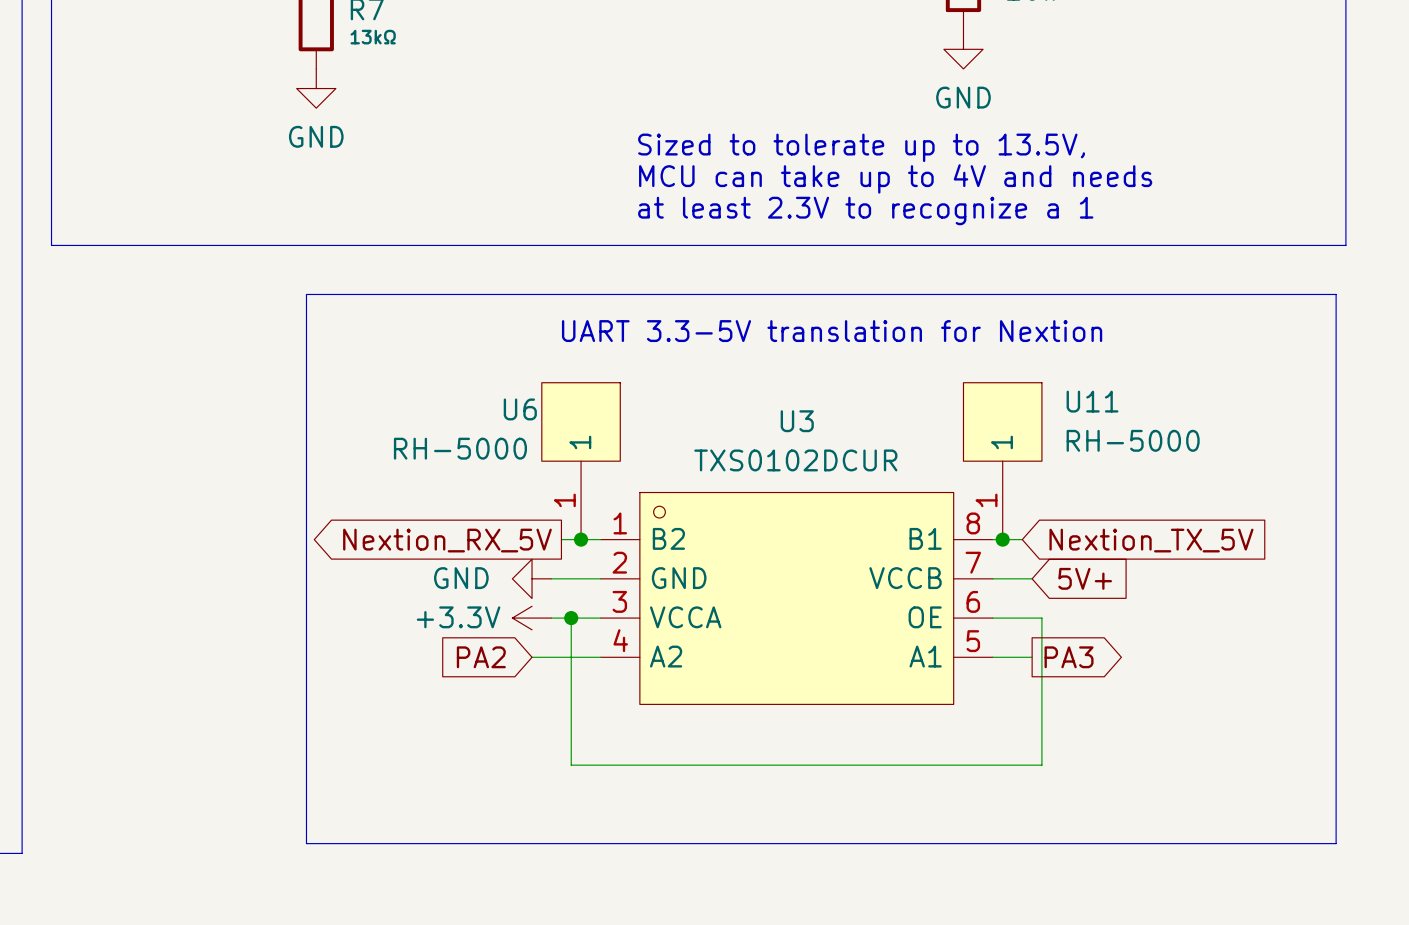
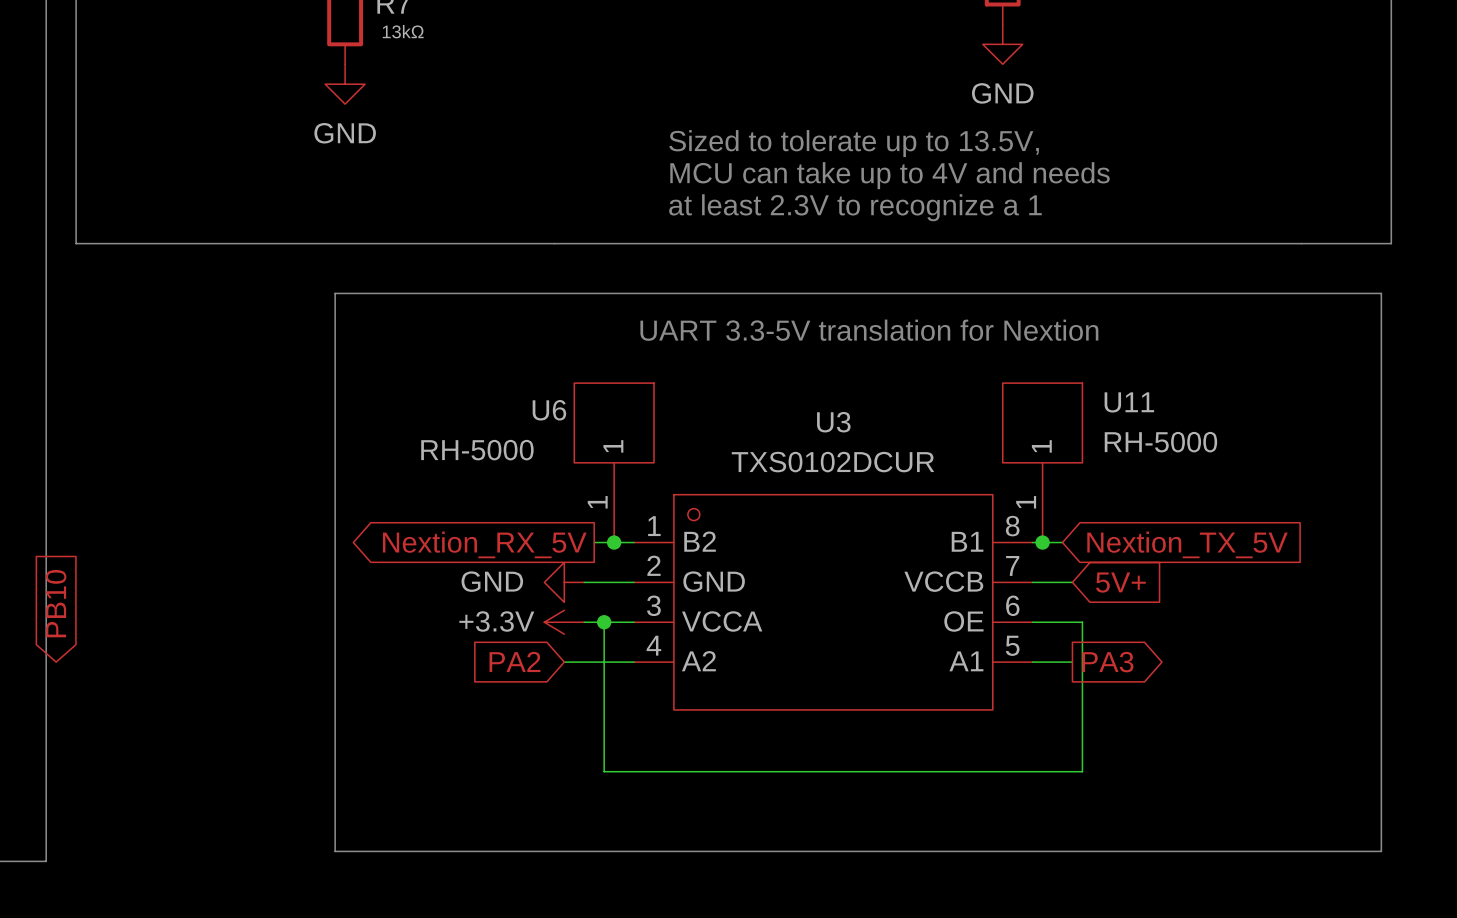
global label: none -> PB10 (56, 603)

